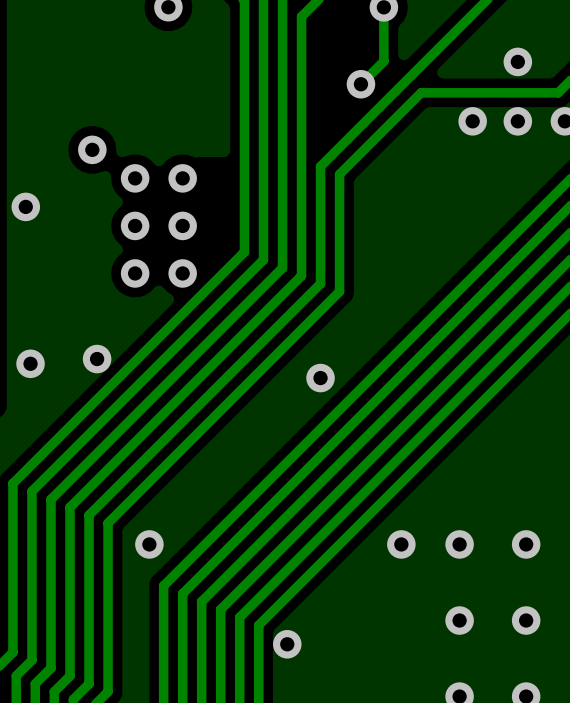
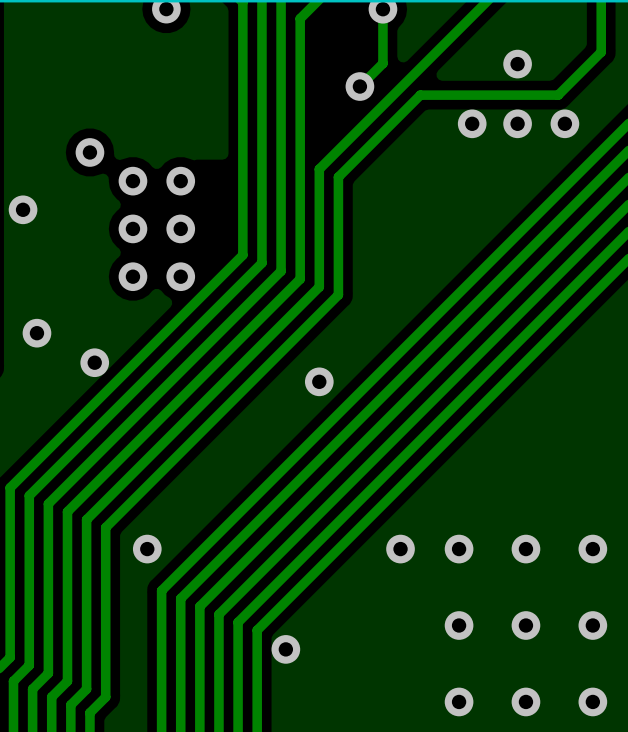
via position: (30, 363) -> (36, 333)

